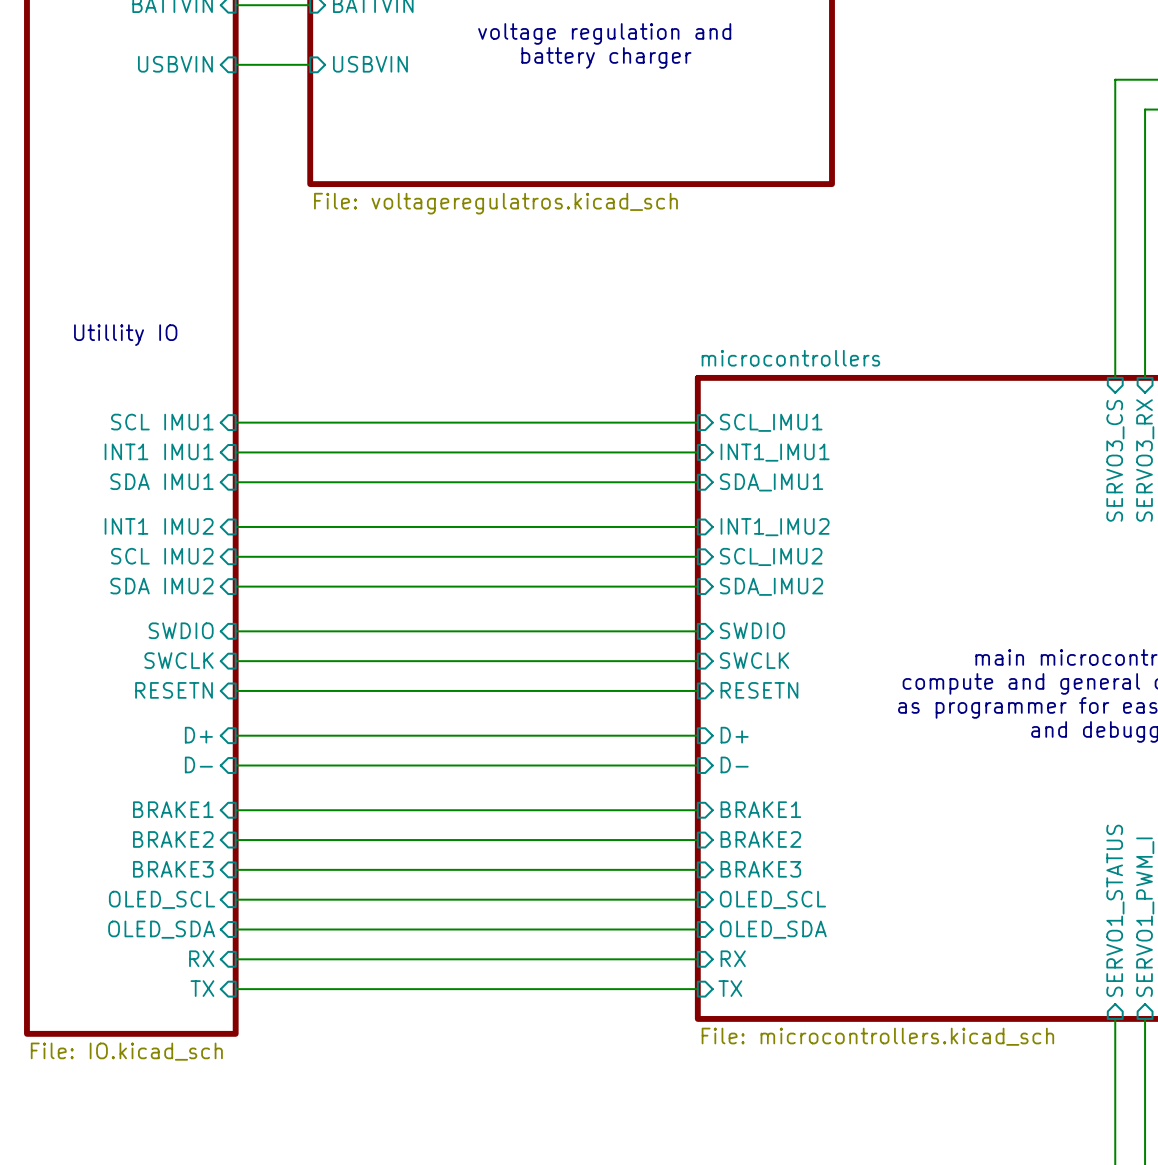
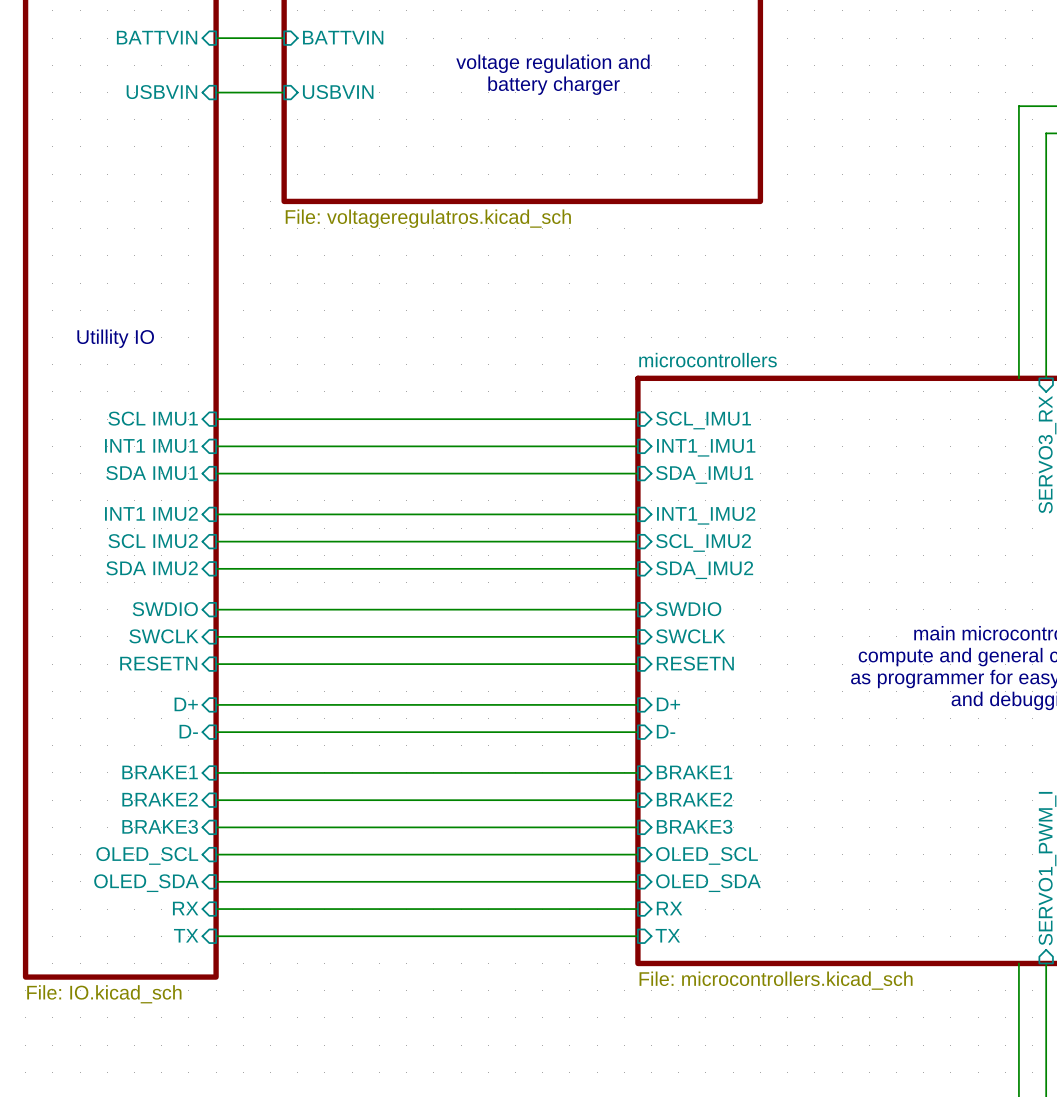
sheet pin: SERVO3_CS (1115, 460) -> none
sheet pin: SERVO1_STATUS (1115, 910) -> none

